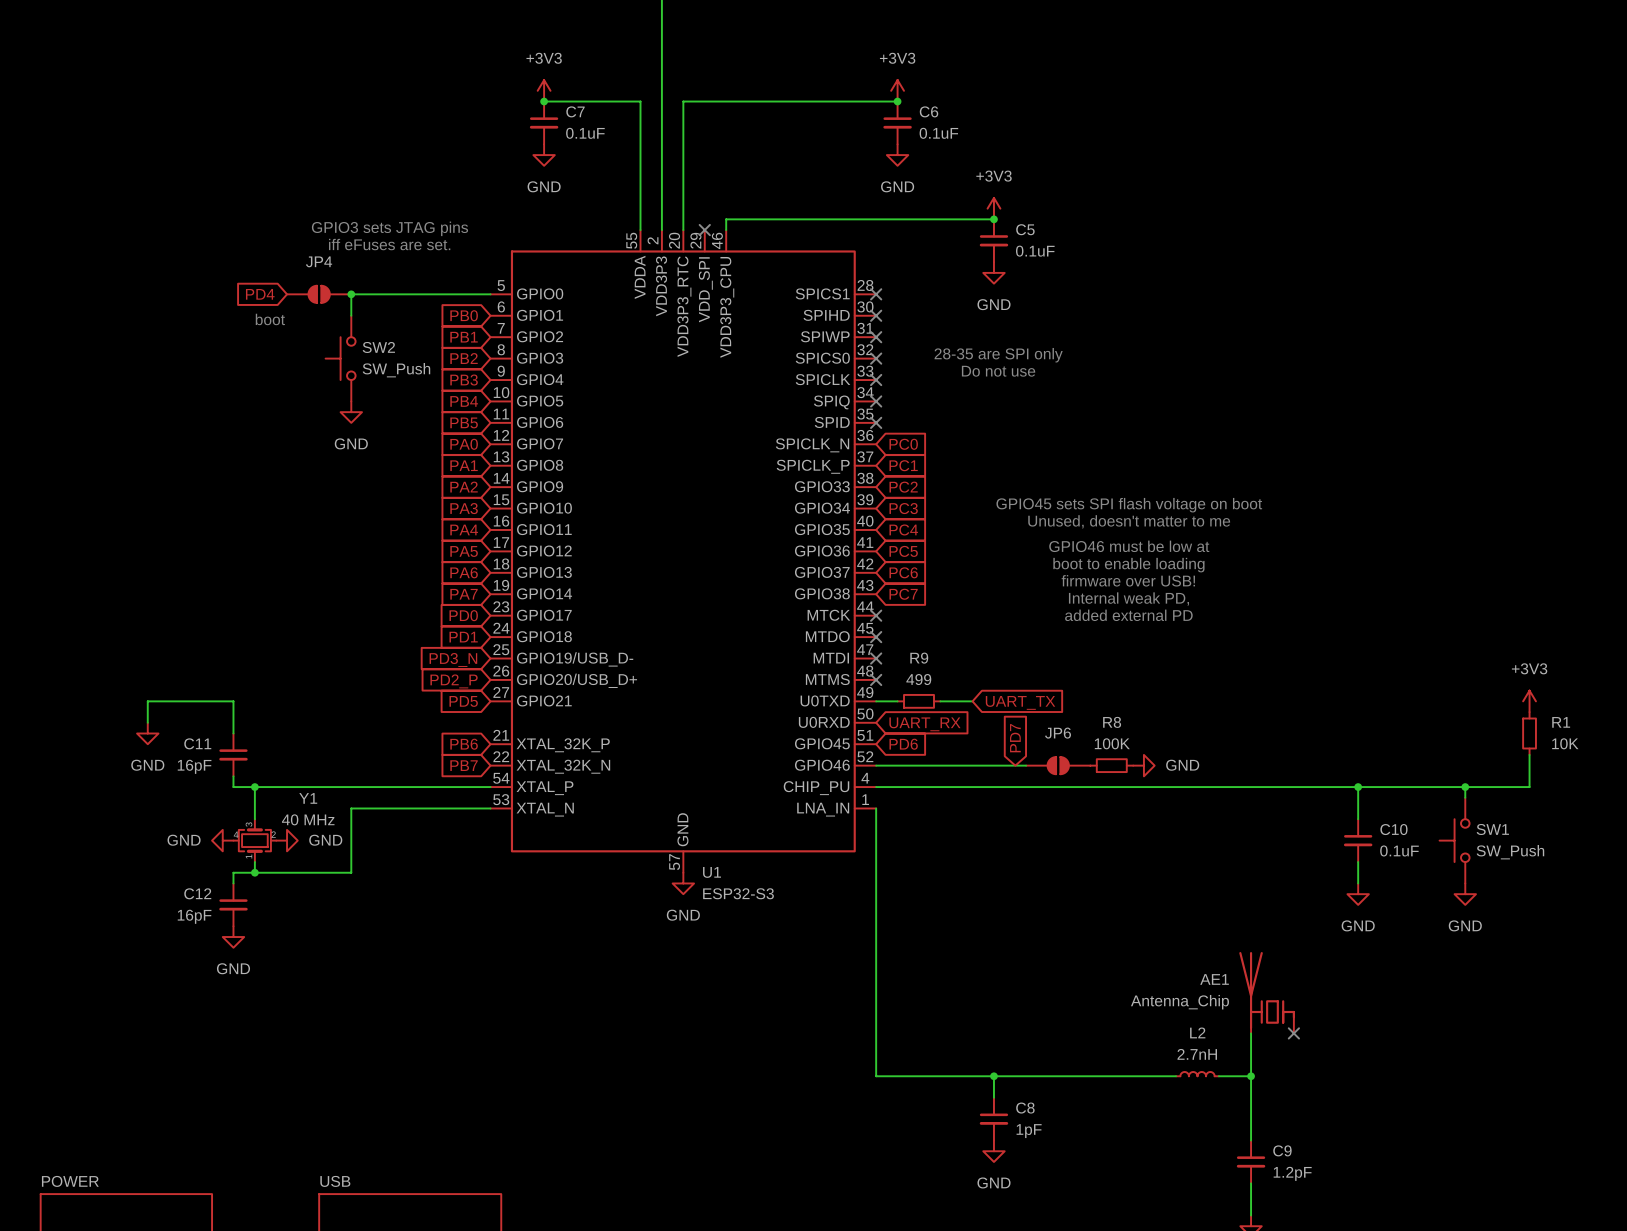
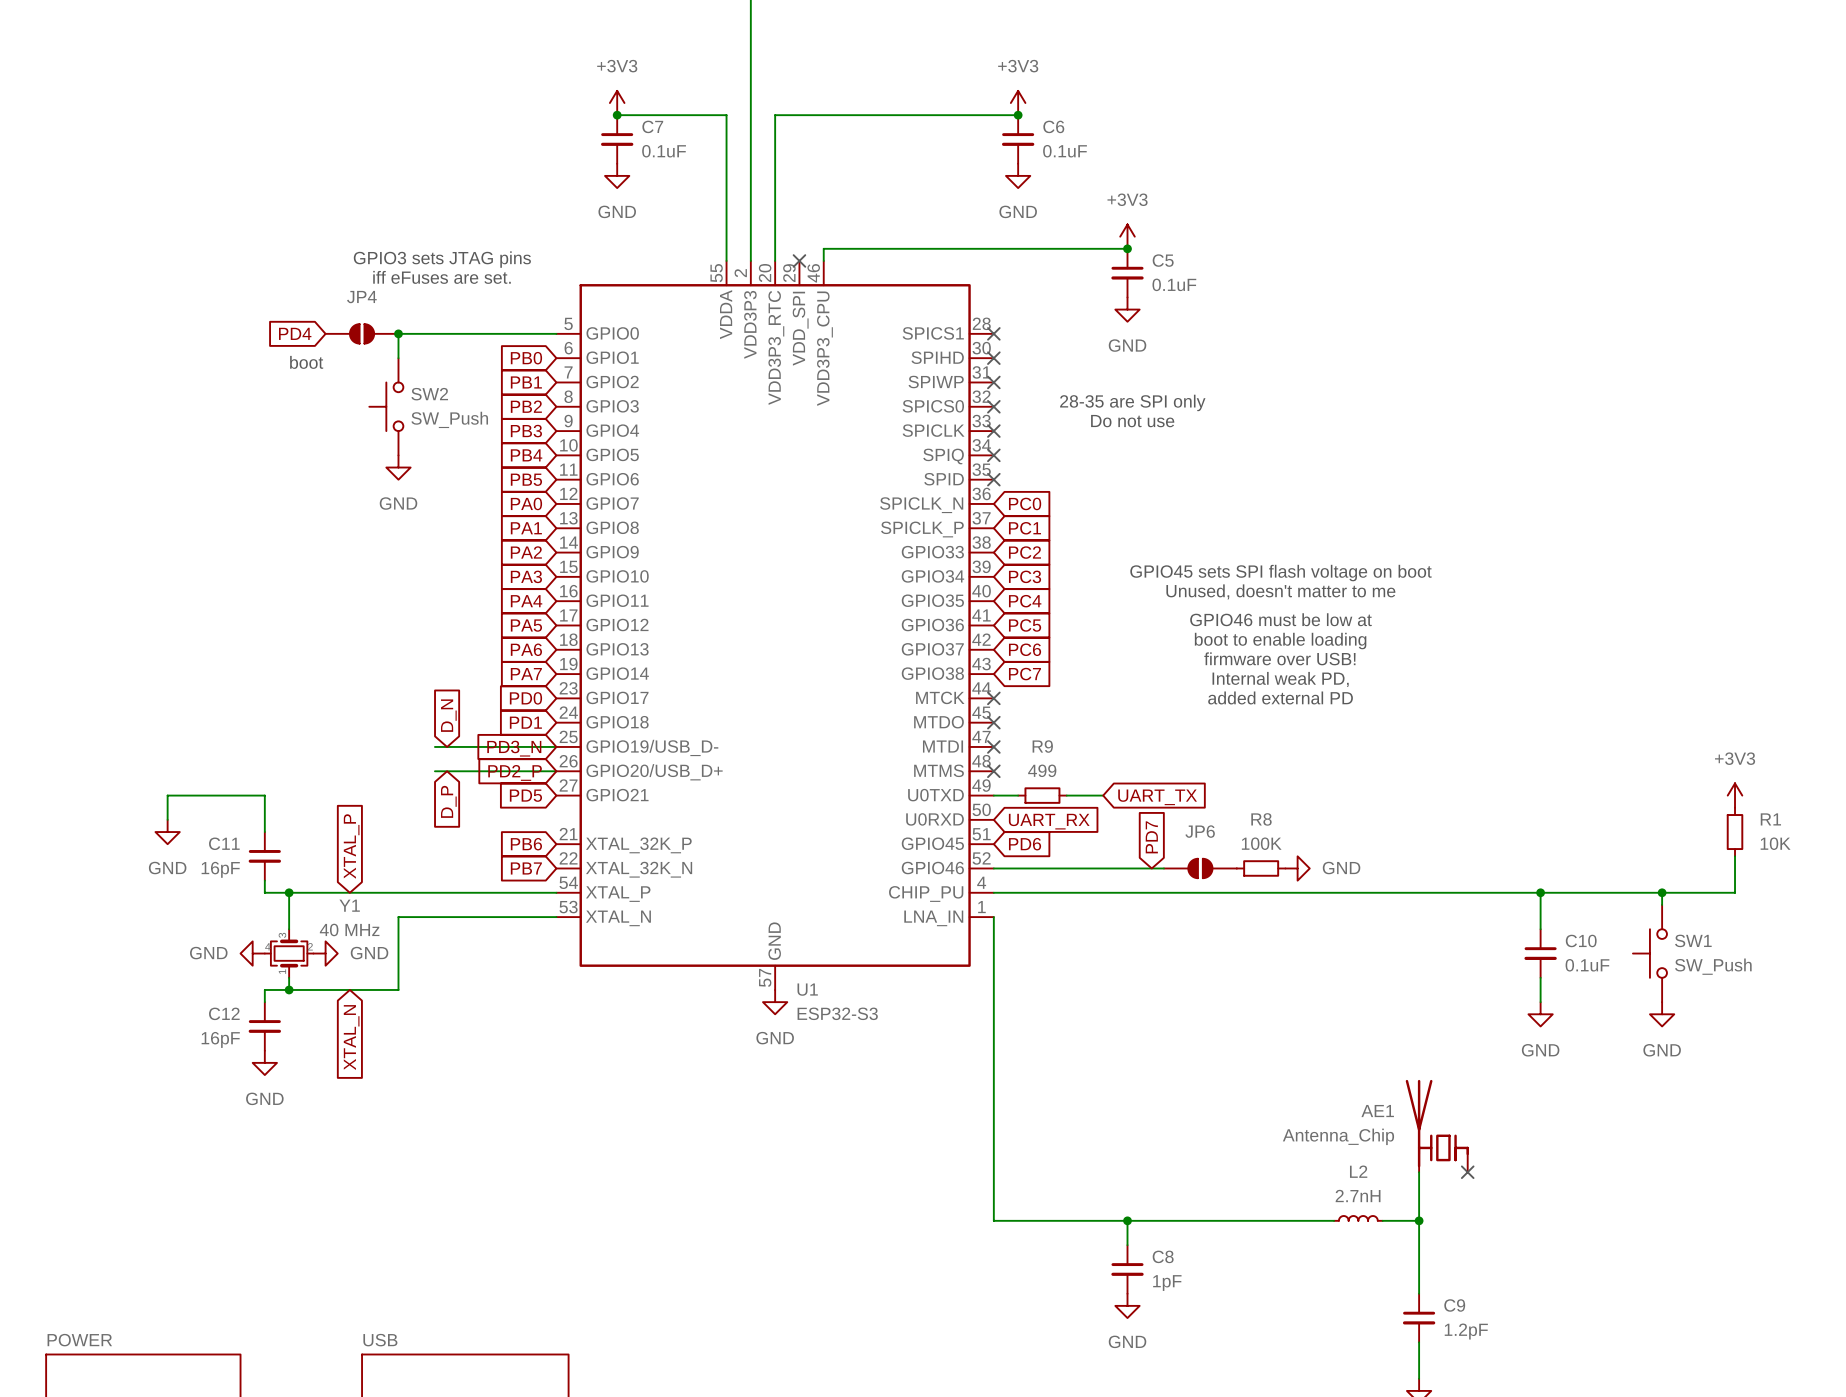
global label: none -> D_N (448, 715)
wire: none -> (434, 746) (556, 746)
wire: none -> (434, 771) (556, 771)
global label: none -> D_P (448, 801)
global label: none -> XTAL_P (351, 846)
global label: none -> XTAL_N (351, 1037)

